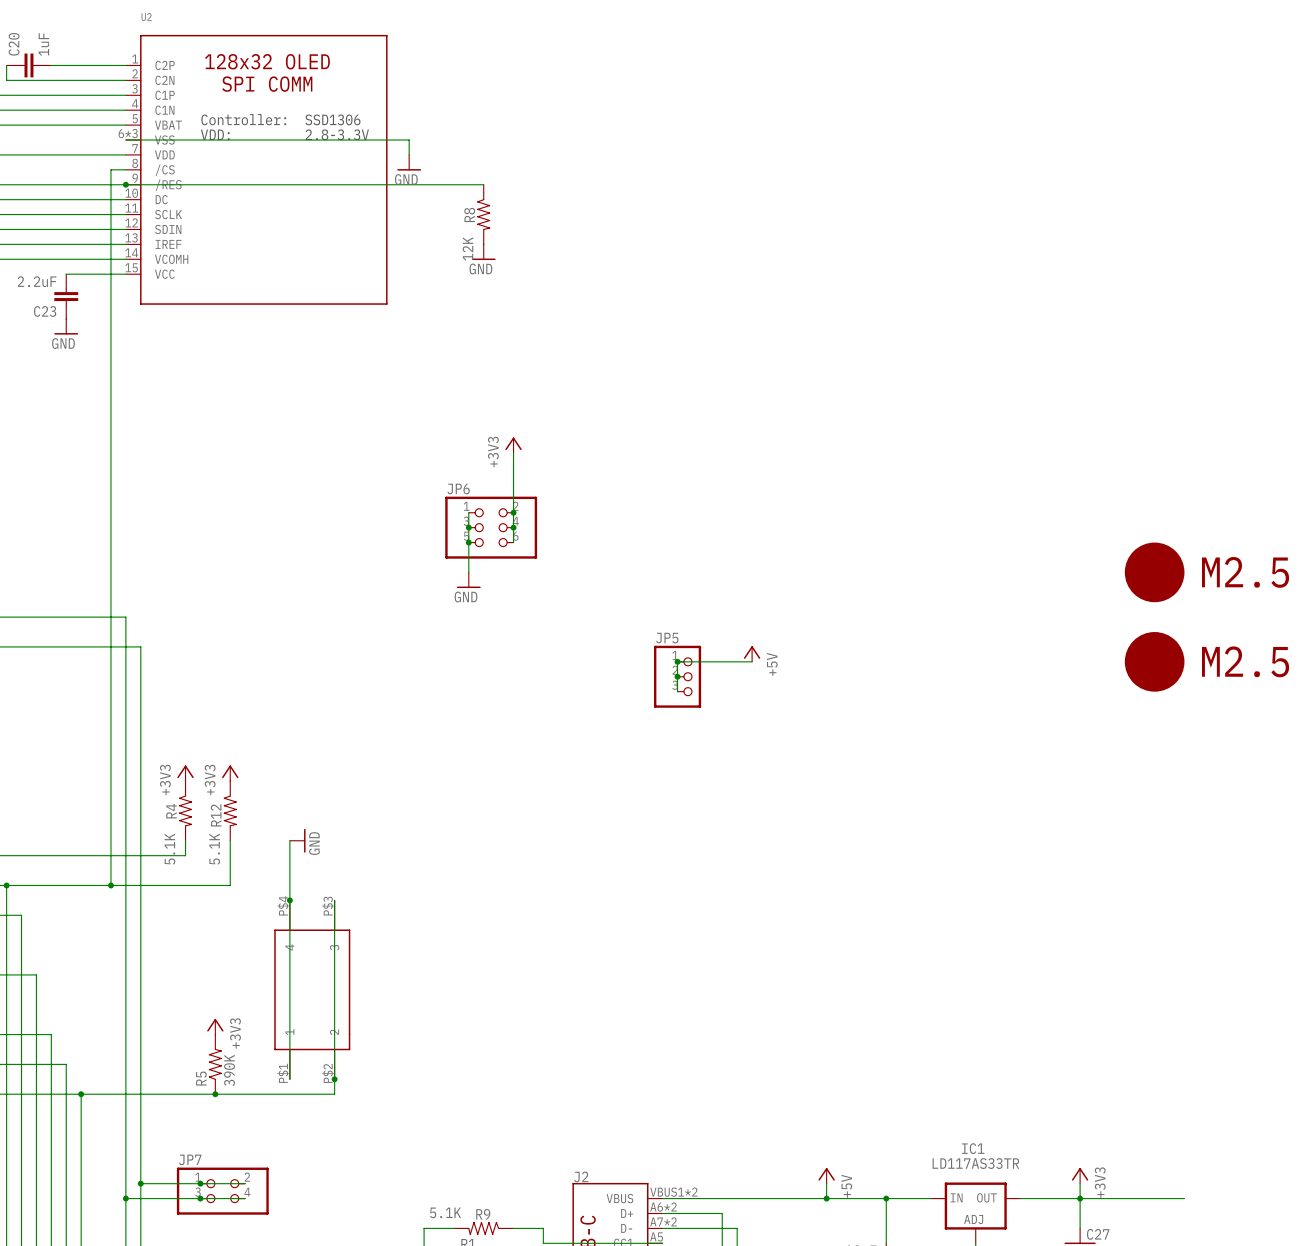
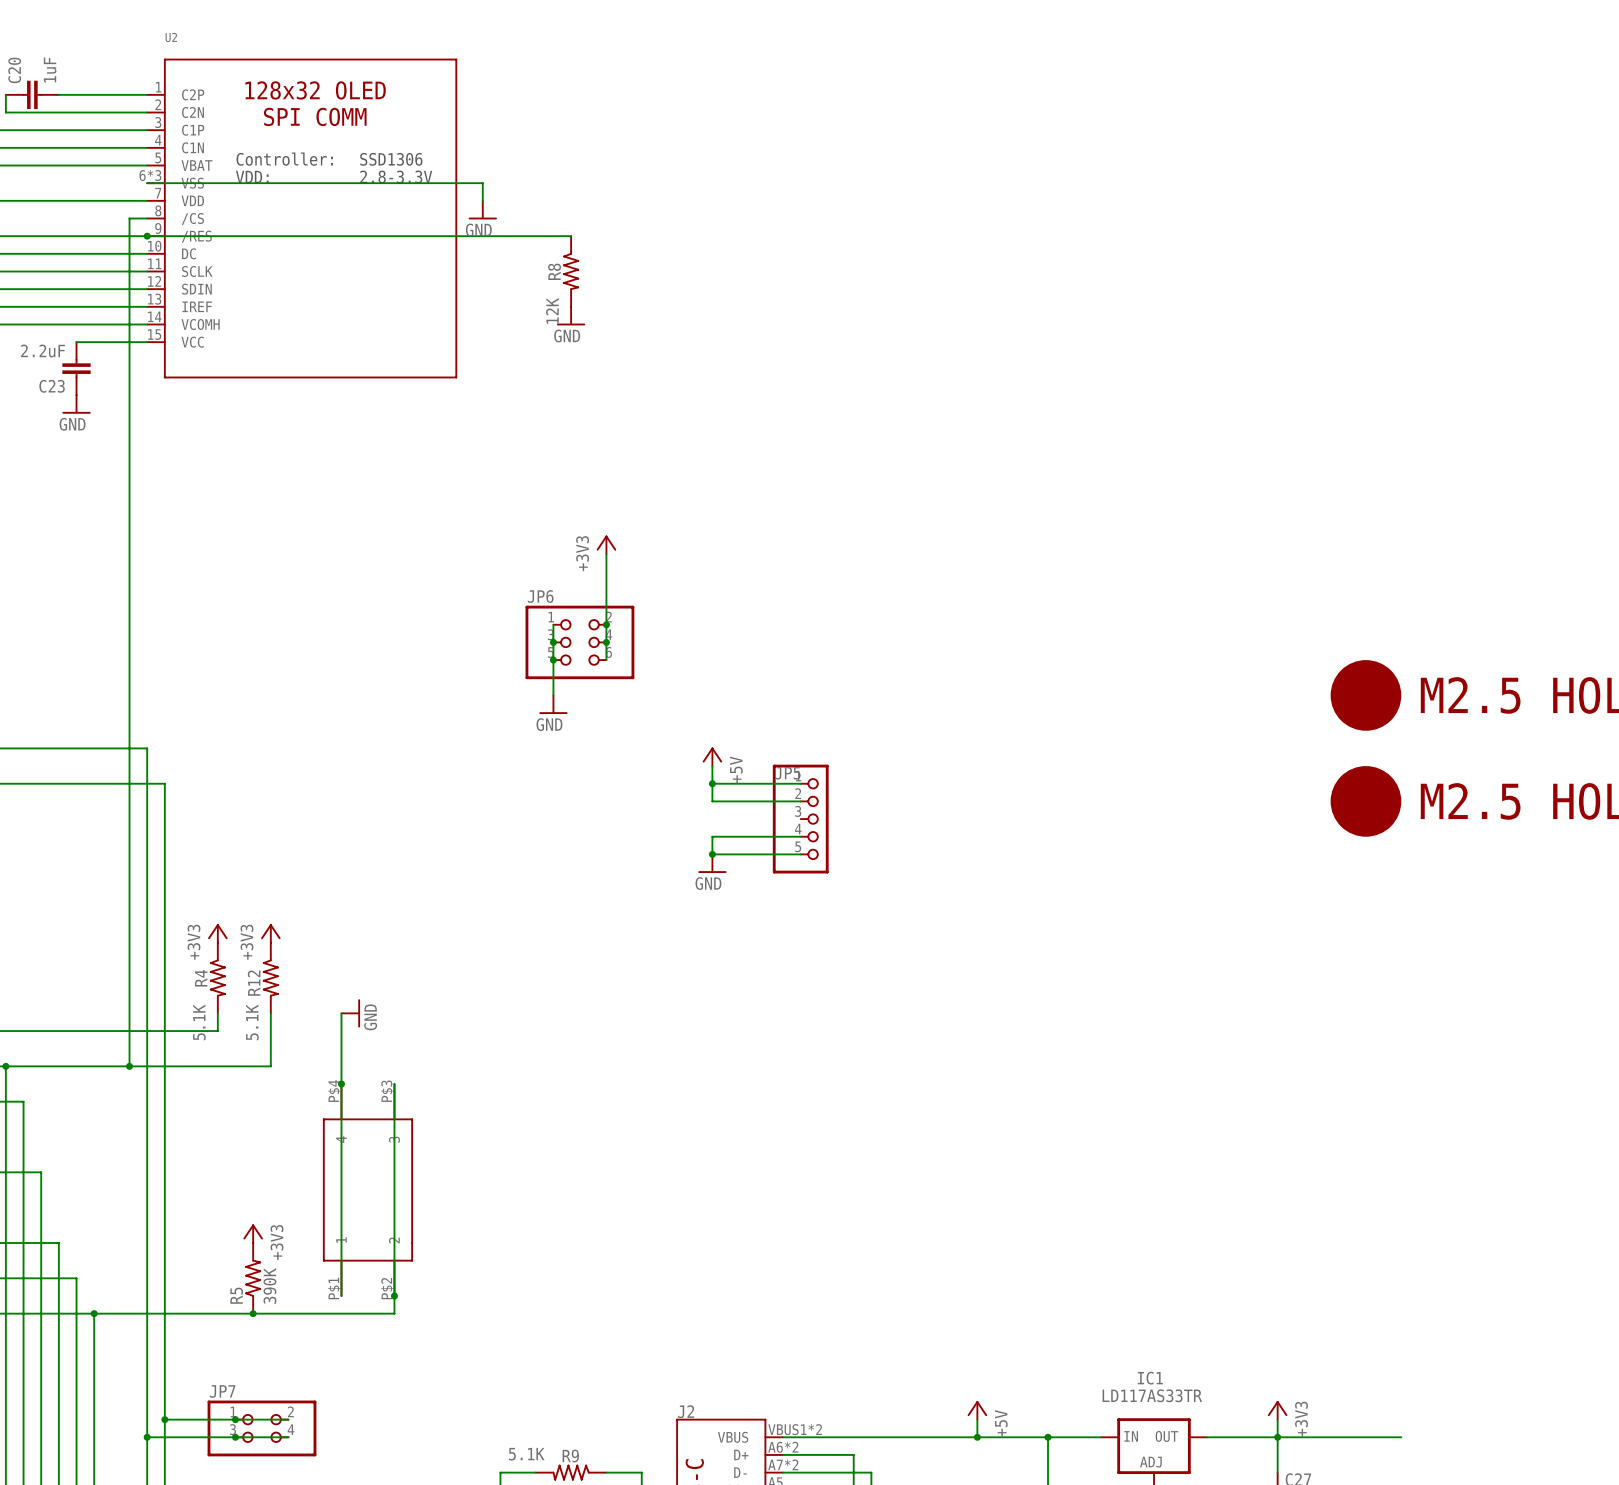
power symbol: none -> +5V (712, 756)
wire: none -> (712, 766) (712, 801) (800, 801)
JP5 symbol: [653, 645, 702, 708] -> [772, 764, 829, 874]
wire: none -> (712, 783) (800, 783)
junction: none -> (712, 783)
power symbol: +5V (752, 654) -> none
junction: (677, 661) -> none
wire: (752, 661) (677, 661) (677, 691) -> (800, 854) (712, 854) (712, 836) (800, 836)
junction: (677, 676) -> none
junction: none -> (712, 854)
power symbol: none -> GND (712, 863)

